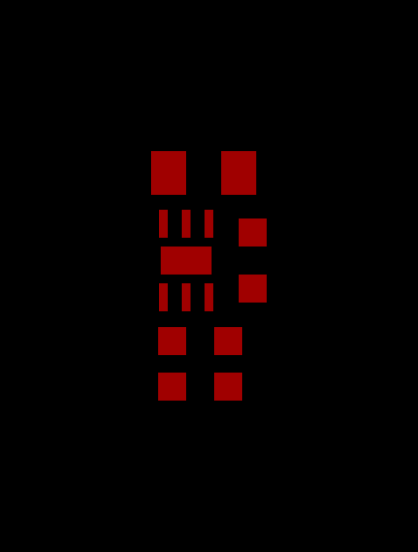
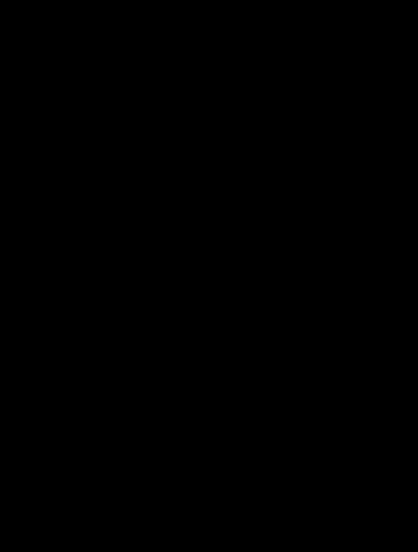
part: (203, 172) -> none
part: (186, 260) -> none
part: (252, 260) -> none
part: (200, 341) -> none
part: (200, 386) -> none

